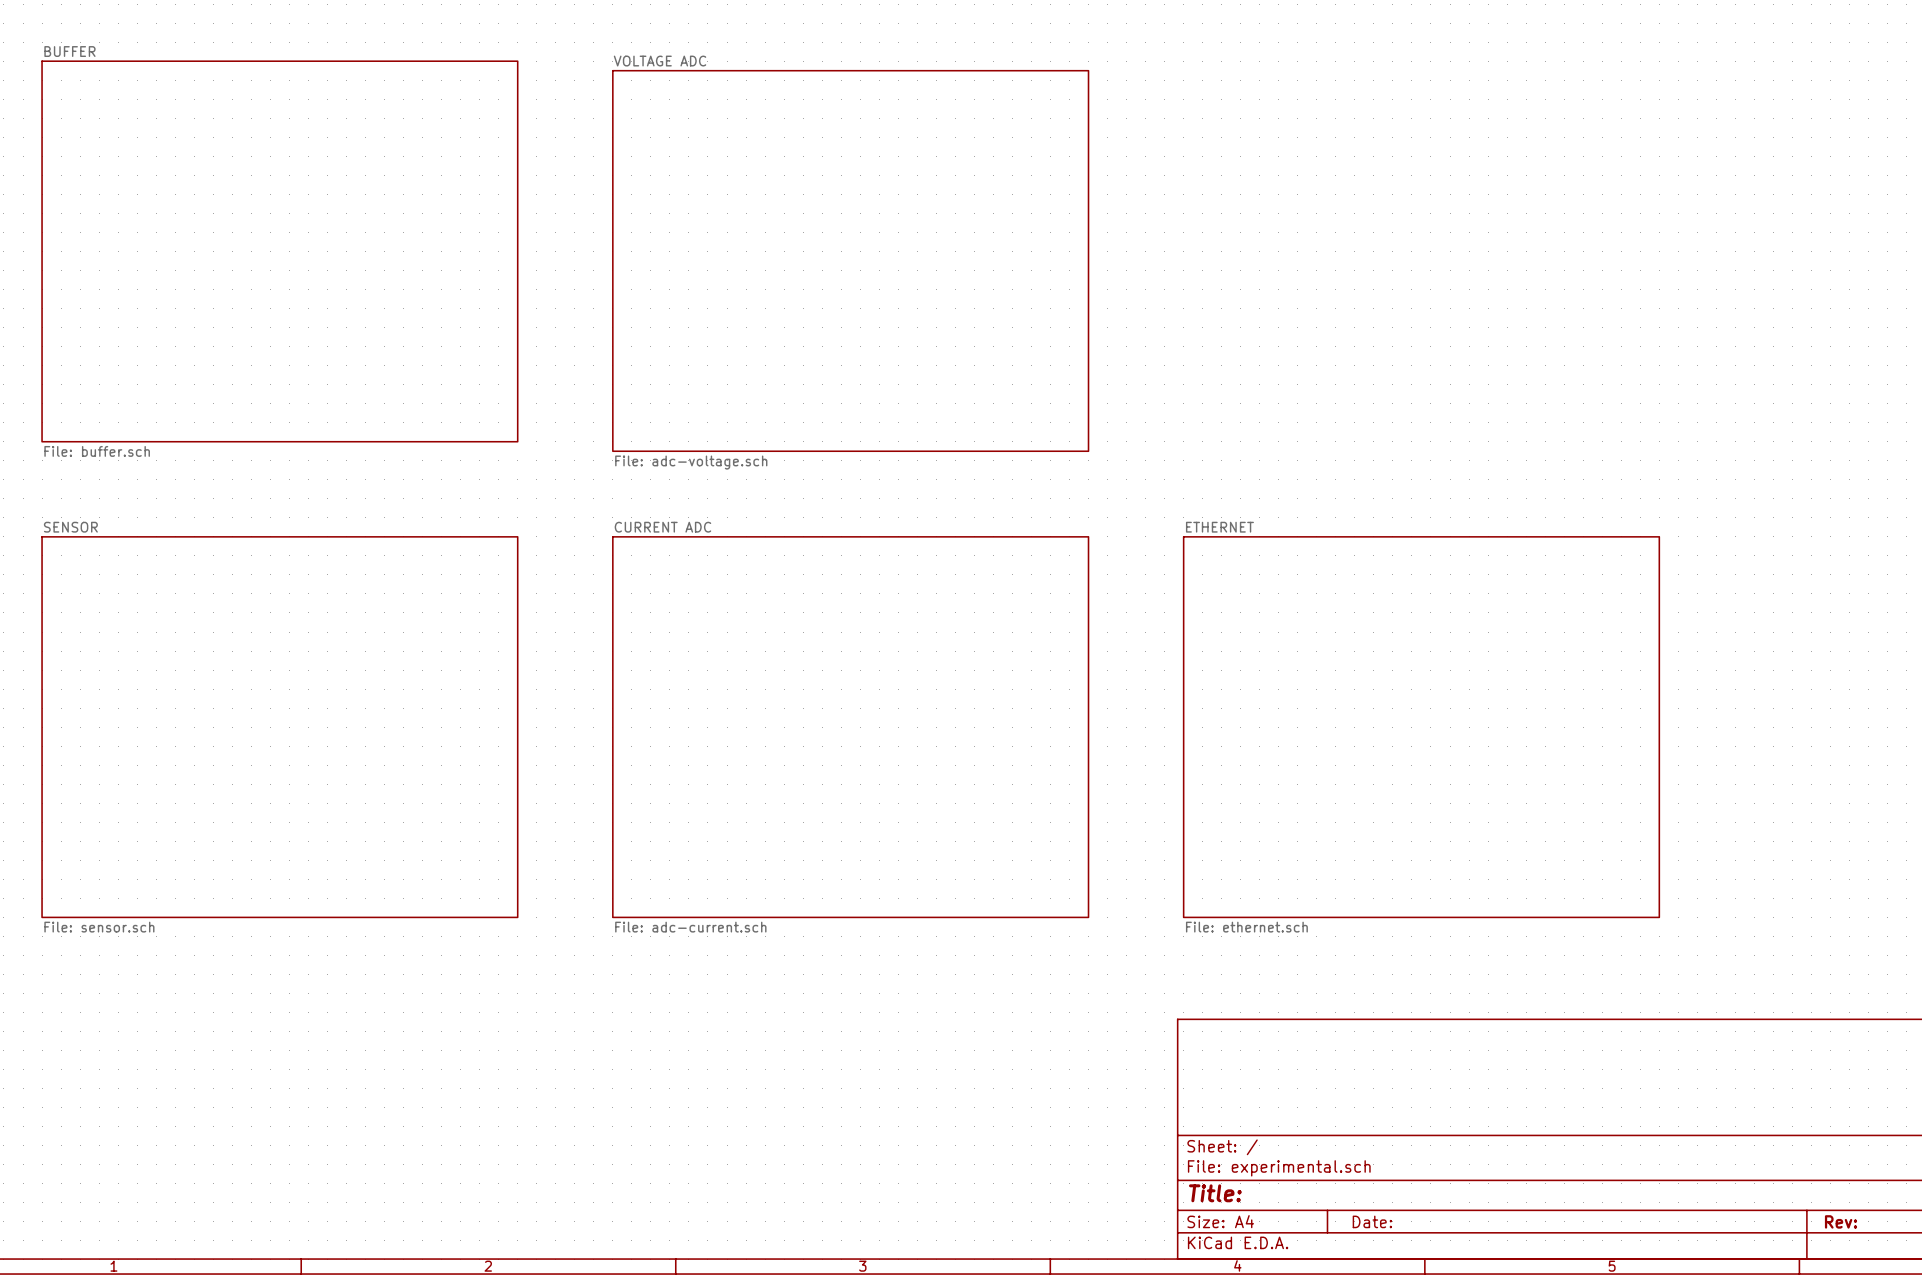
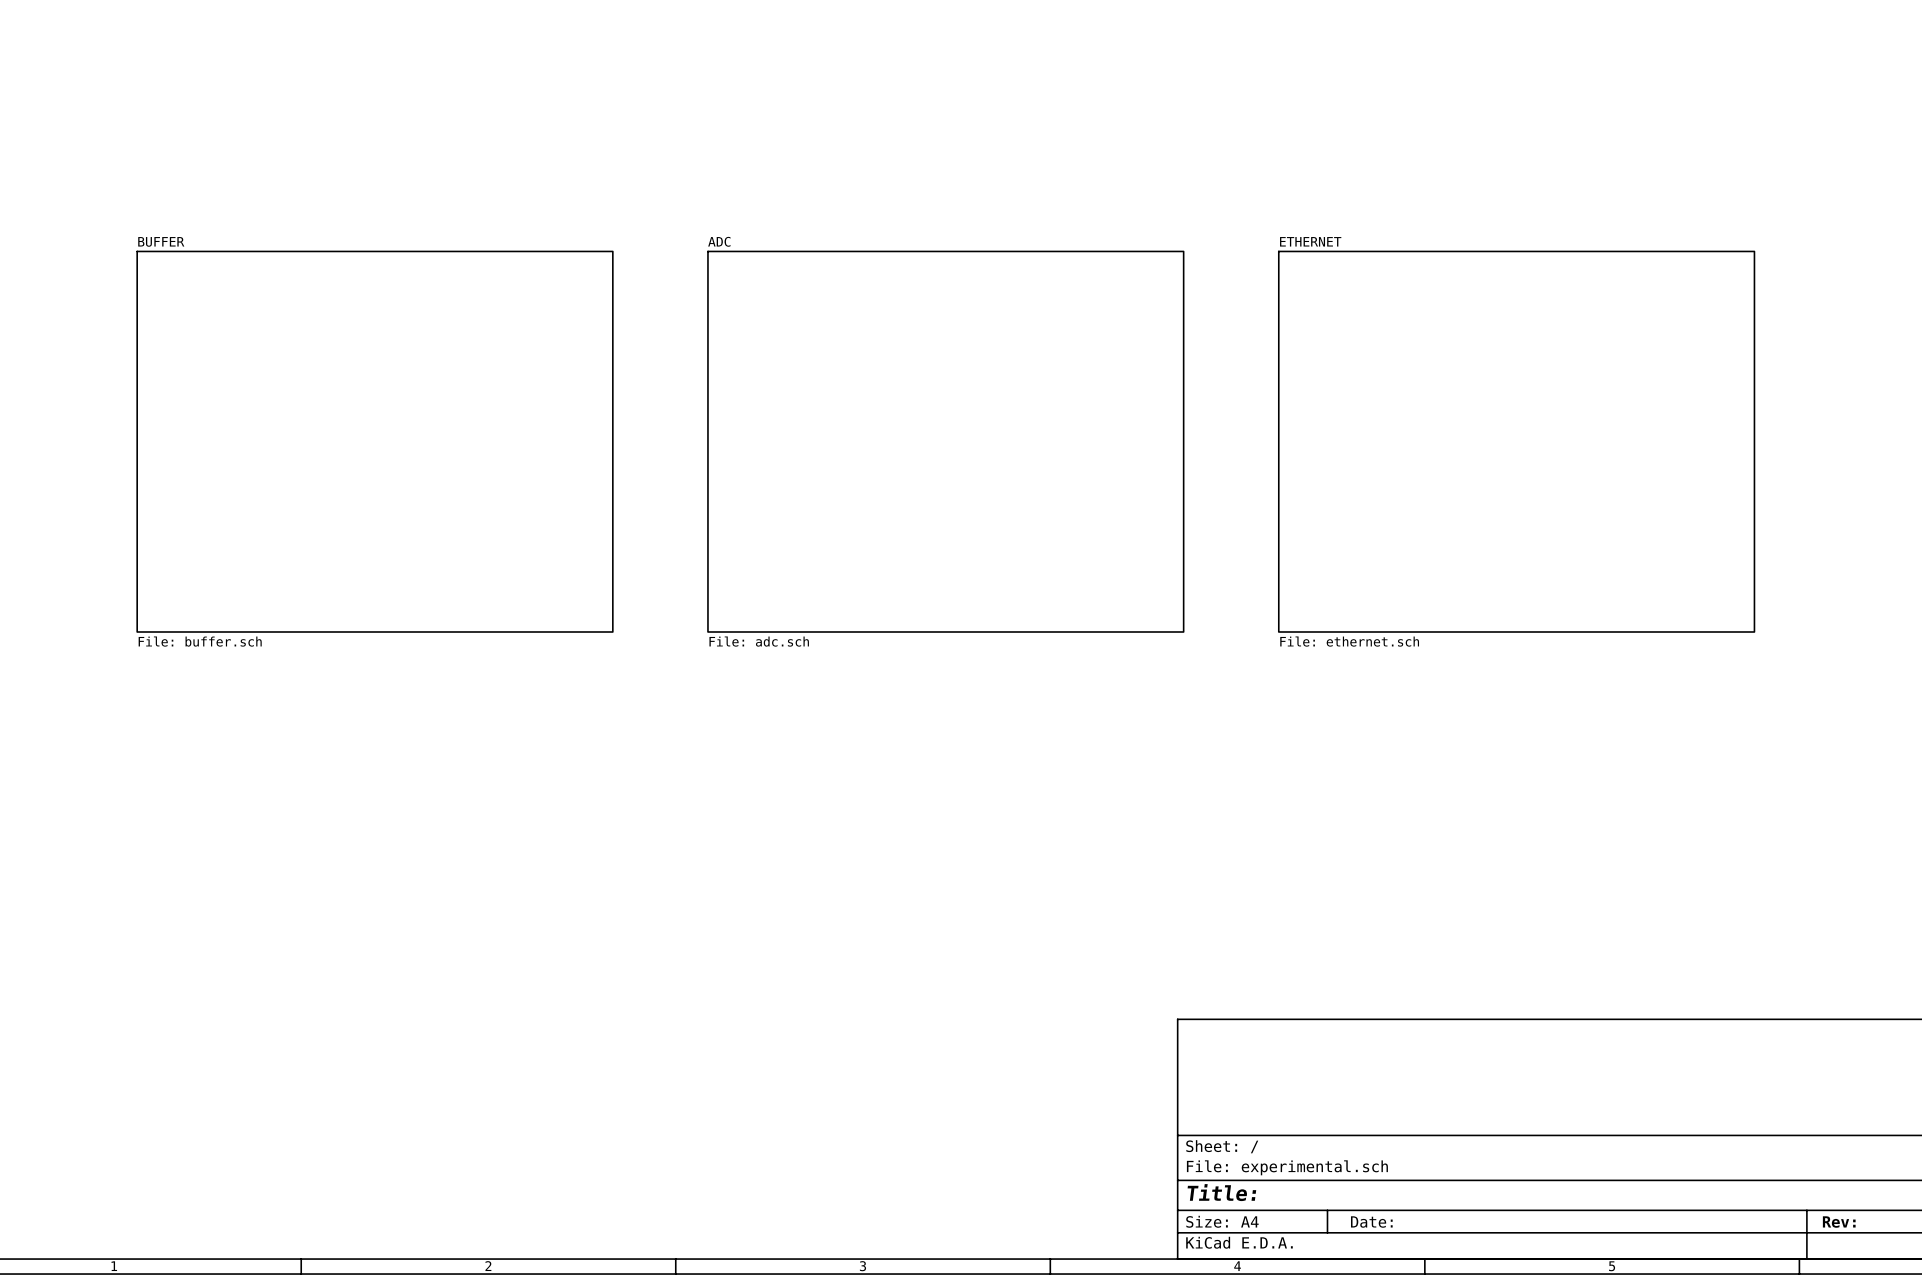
sheet BUFFER: File: buffer.sch (279, 251) -> none
sheet VOLTAGE ADC: File: adc-voltage.sch (850, 260) -> none
sheet BUFFER: none -> File: buffer.sch (375, 441)
sheet ADC: none -> File: adc.sch (945, 441)
sheet ETHERNET: none -> File: ethernet.sch (1516, 441)
sheet SENSOR: File: sensor.sch (279, 727) -> none
sheet CURRENT ADC: File: adc-current.sch (850, 727) -> none
sheet ETHERNET: File: ethernet.sch (1421, 727) -> none

